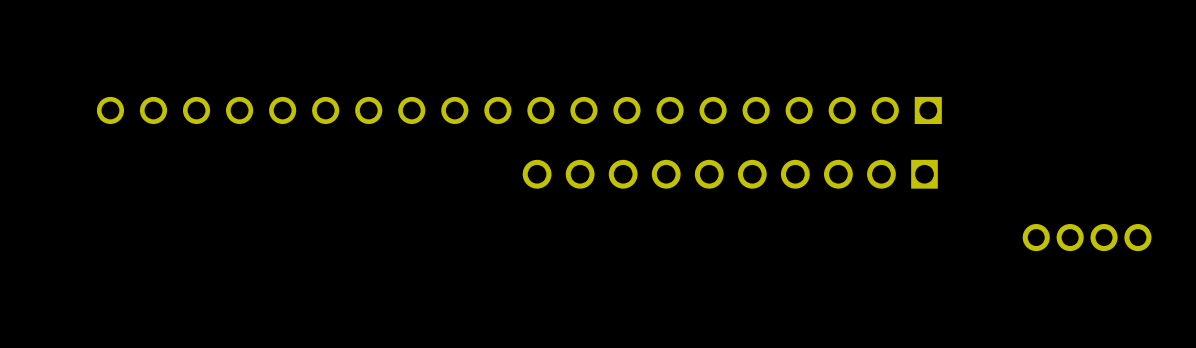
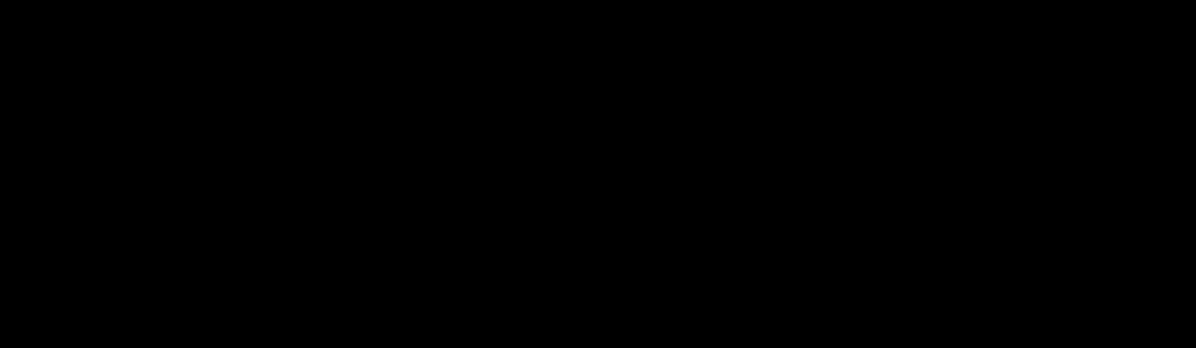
part: (519, 110) -> none
part: (730, 174) -> none
part: (1087, 237) -> none

